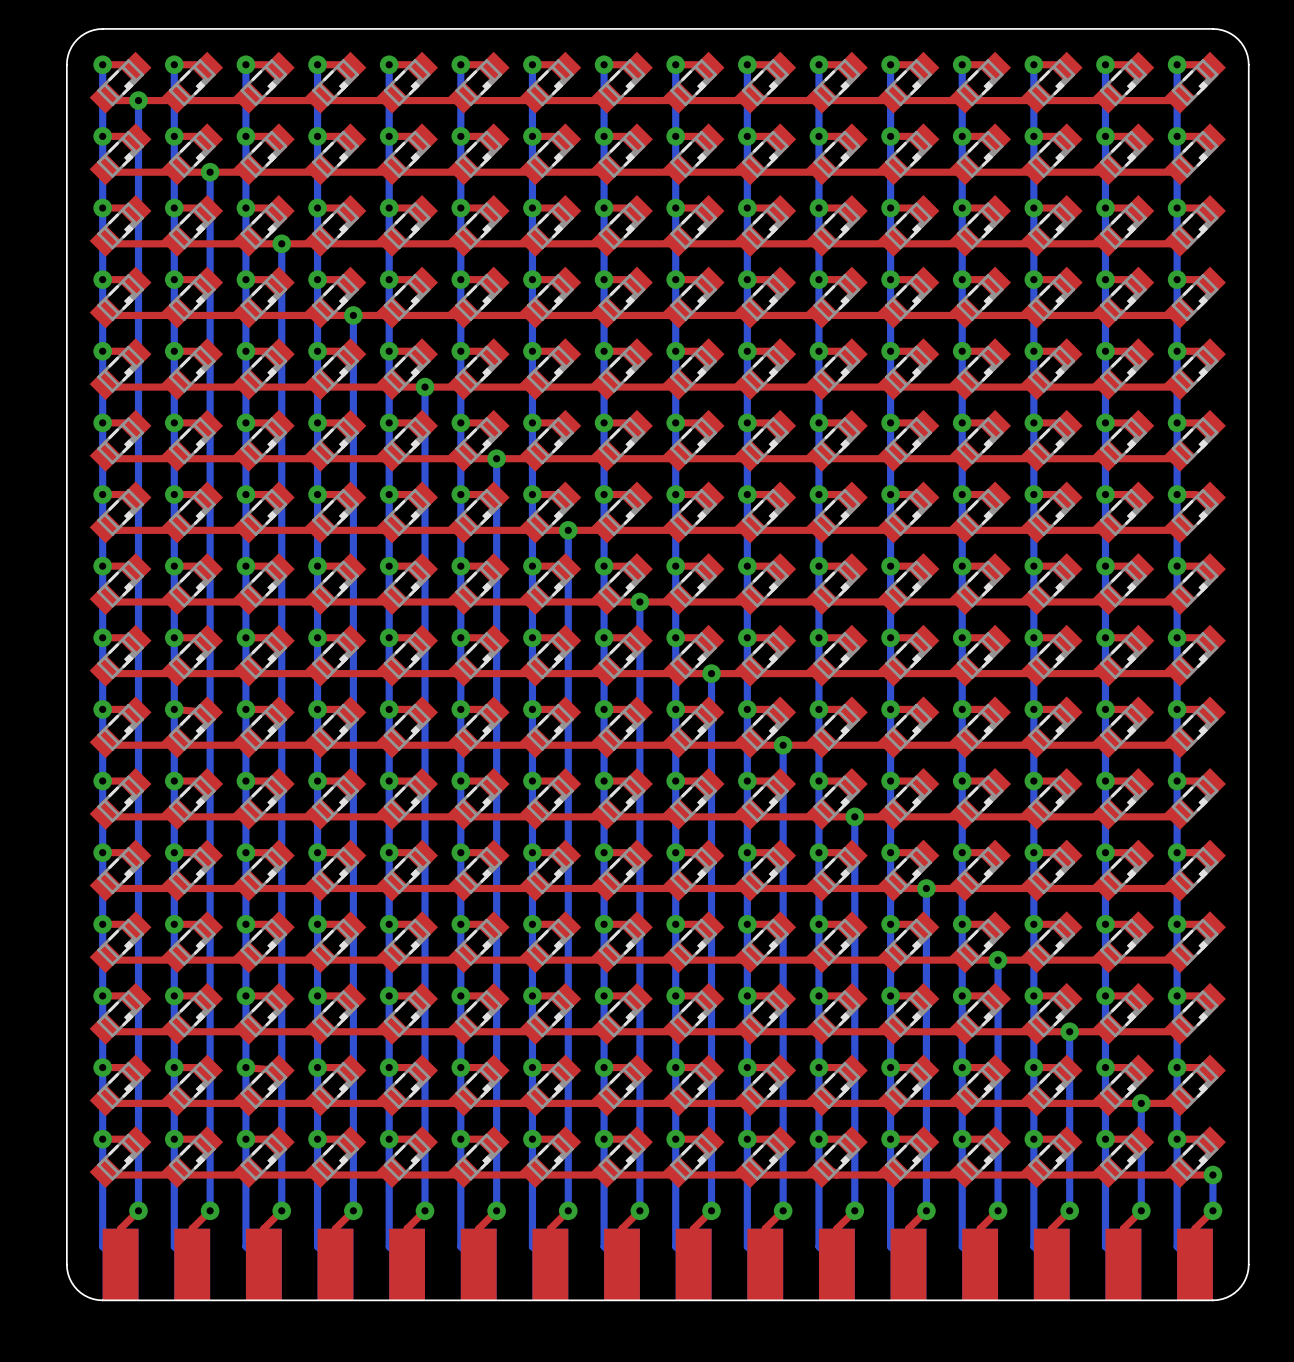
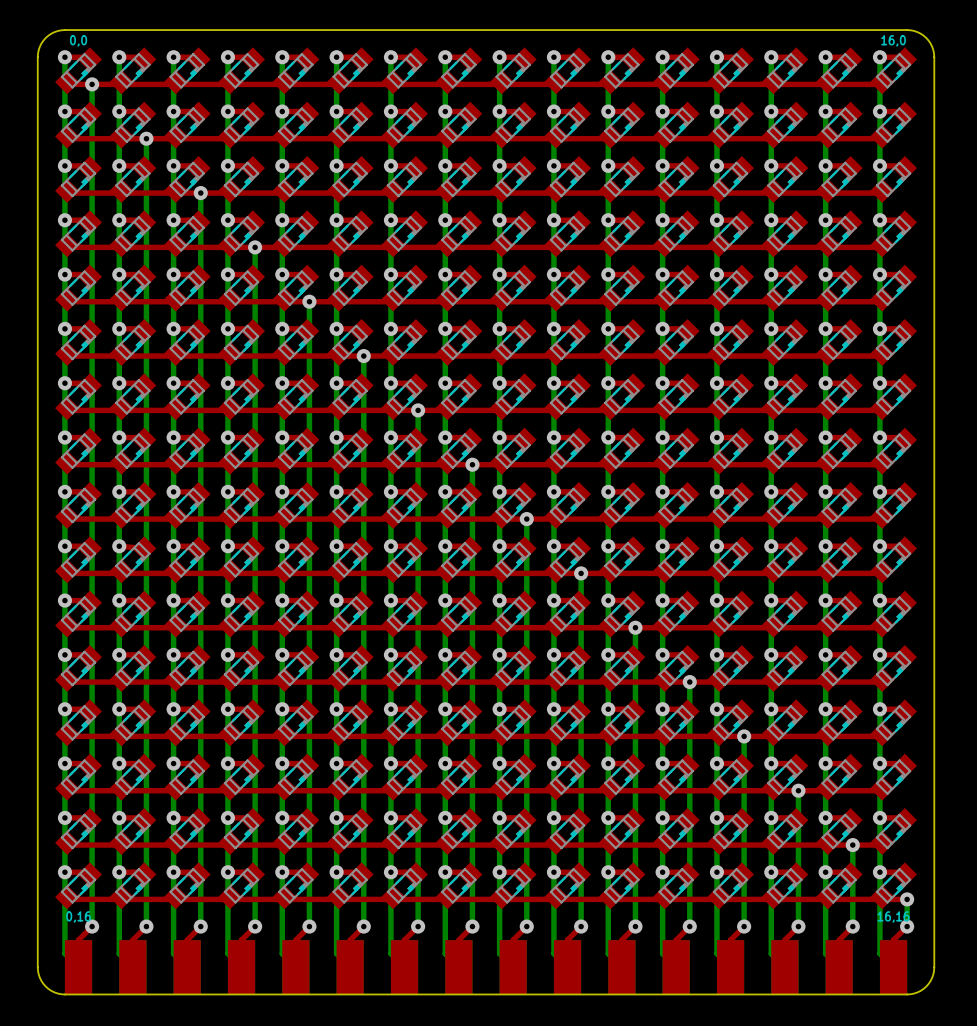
text: none -> 0,0 (78, 40)
text: none -> 16,0 (893, 40)
text: none -> 0,16 (78, 917)
text: none -> 16,16 (893, 917)

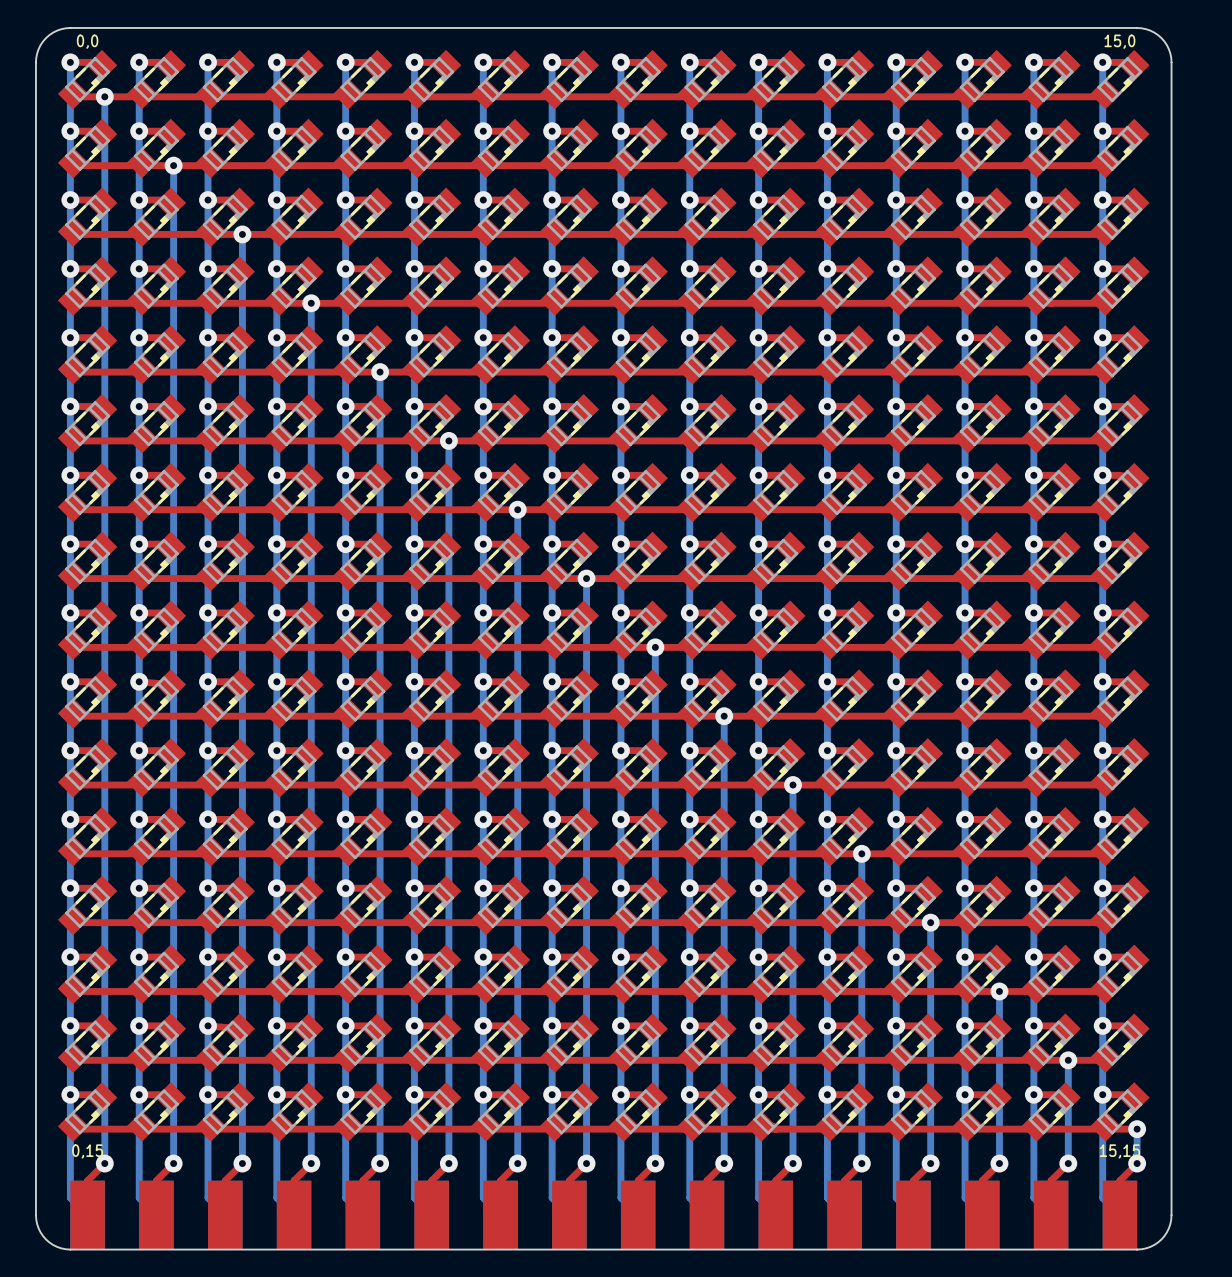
text: 16,0 (893, 40) -> 15,0 (1119, 41)
text: 0,16 (78, 917) -> 0,15 (87, 1151)
text: 16,16 (893, 917) -> 15,15 (1119, 1151)

